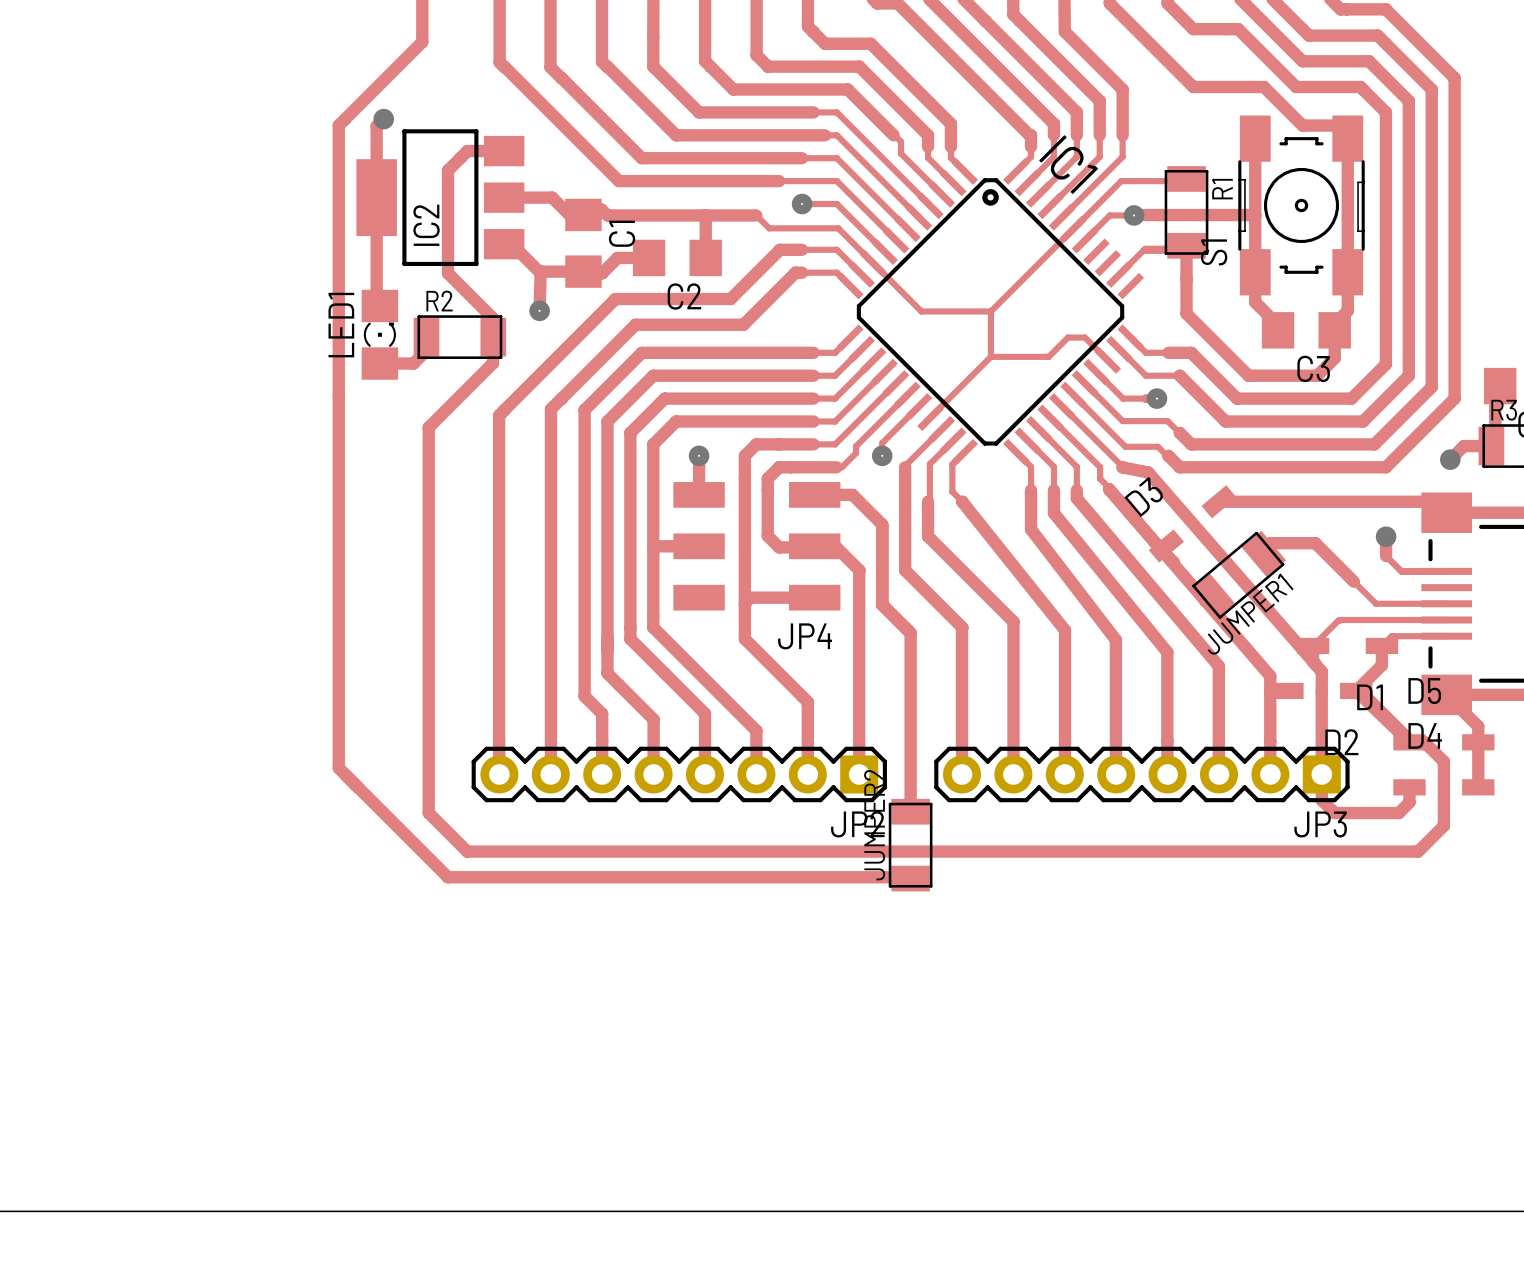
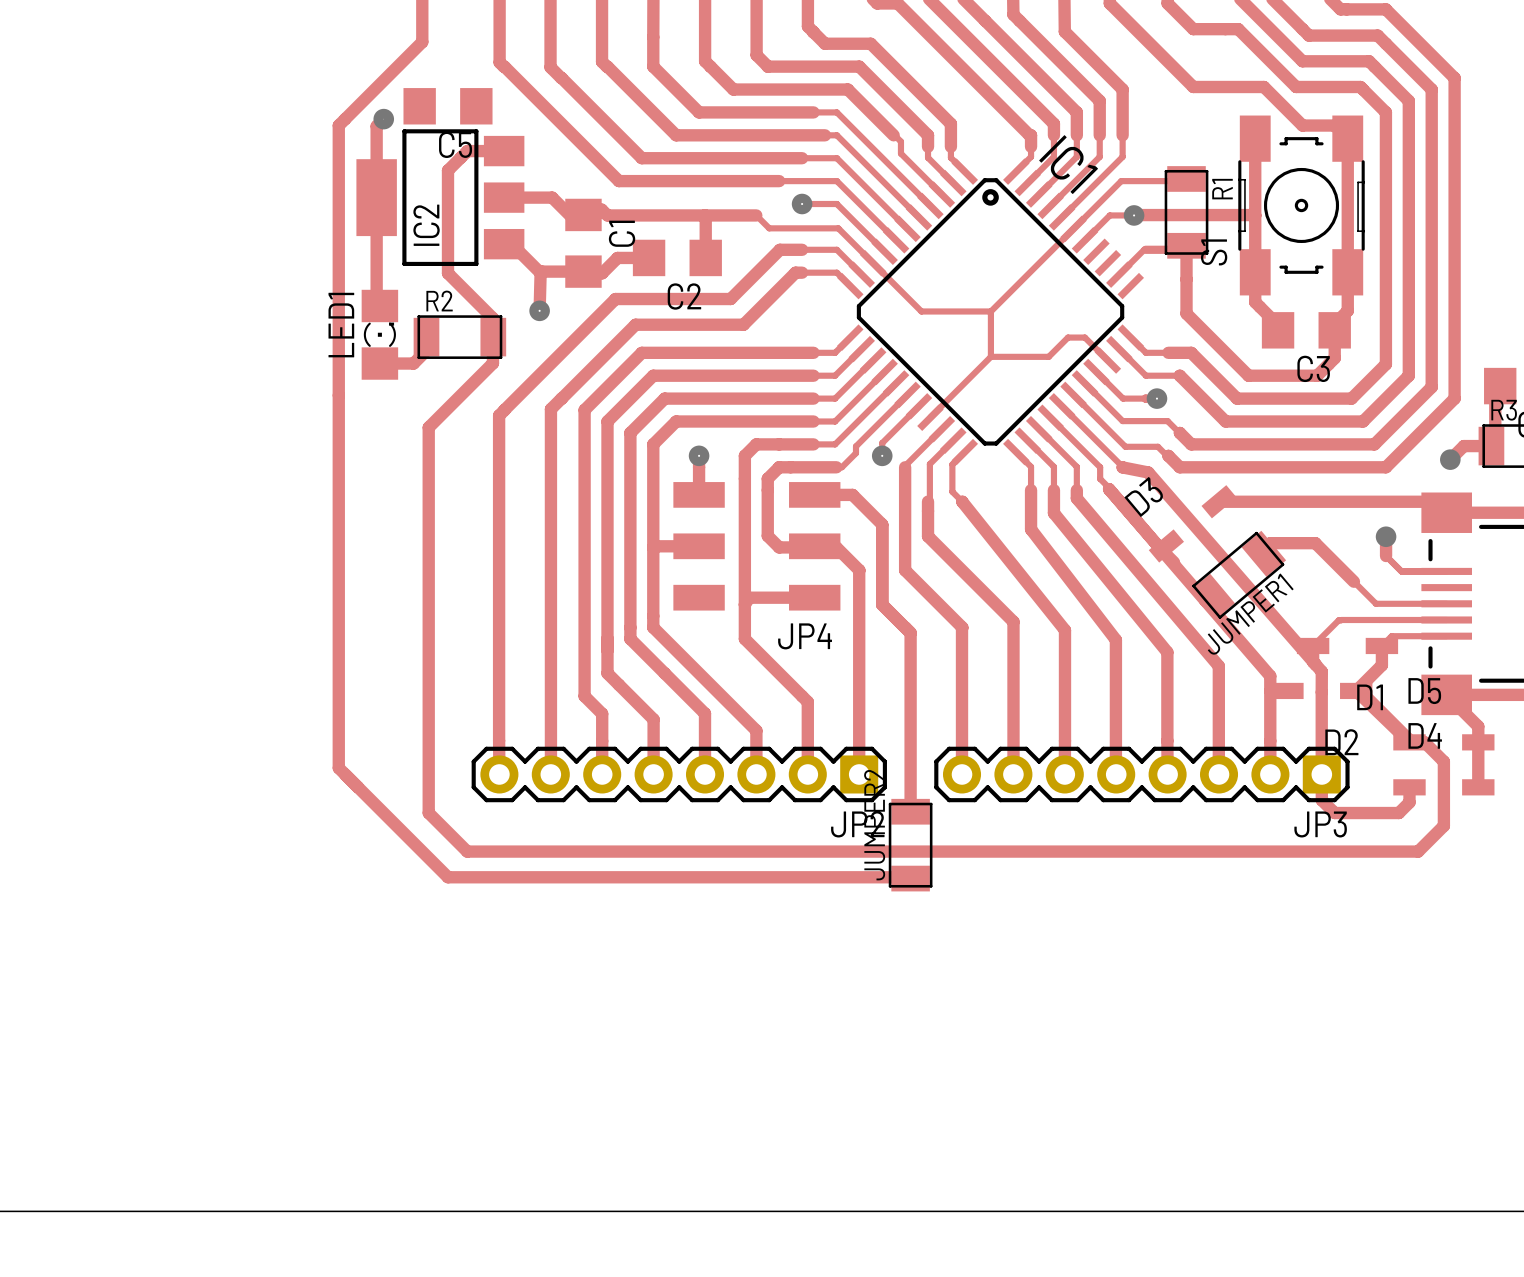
C5: none -> (448, 106)

